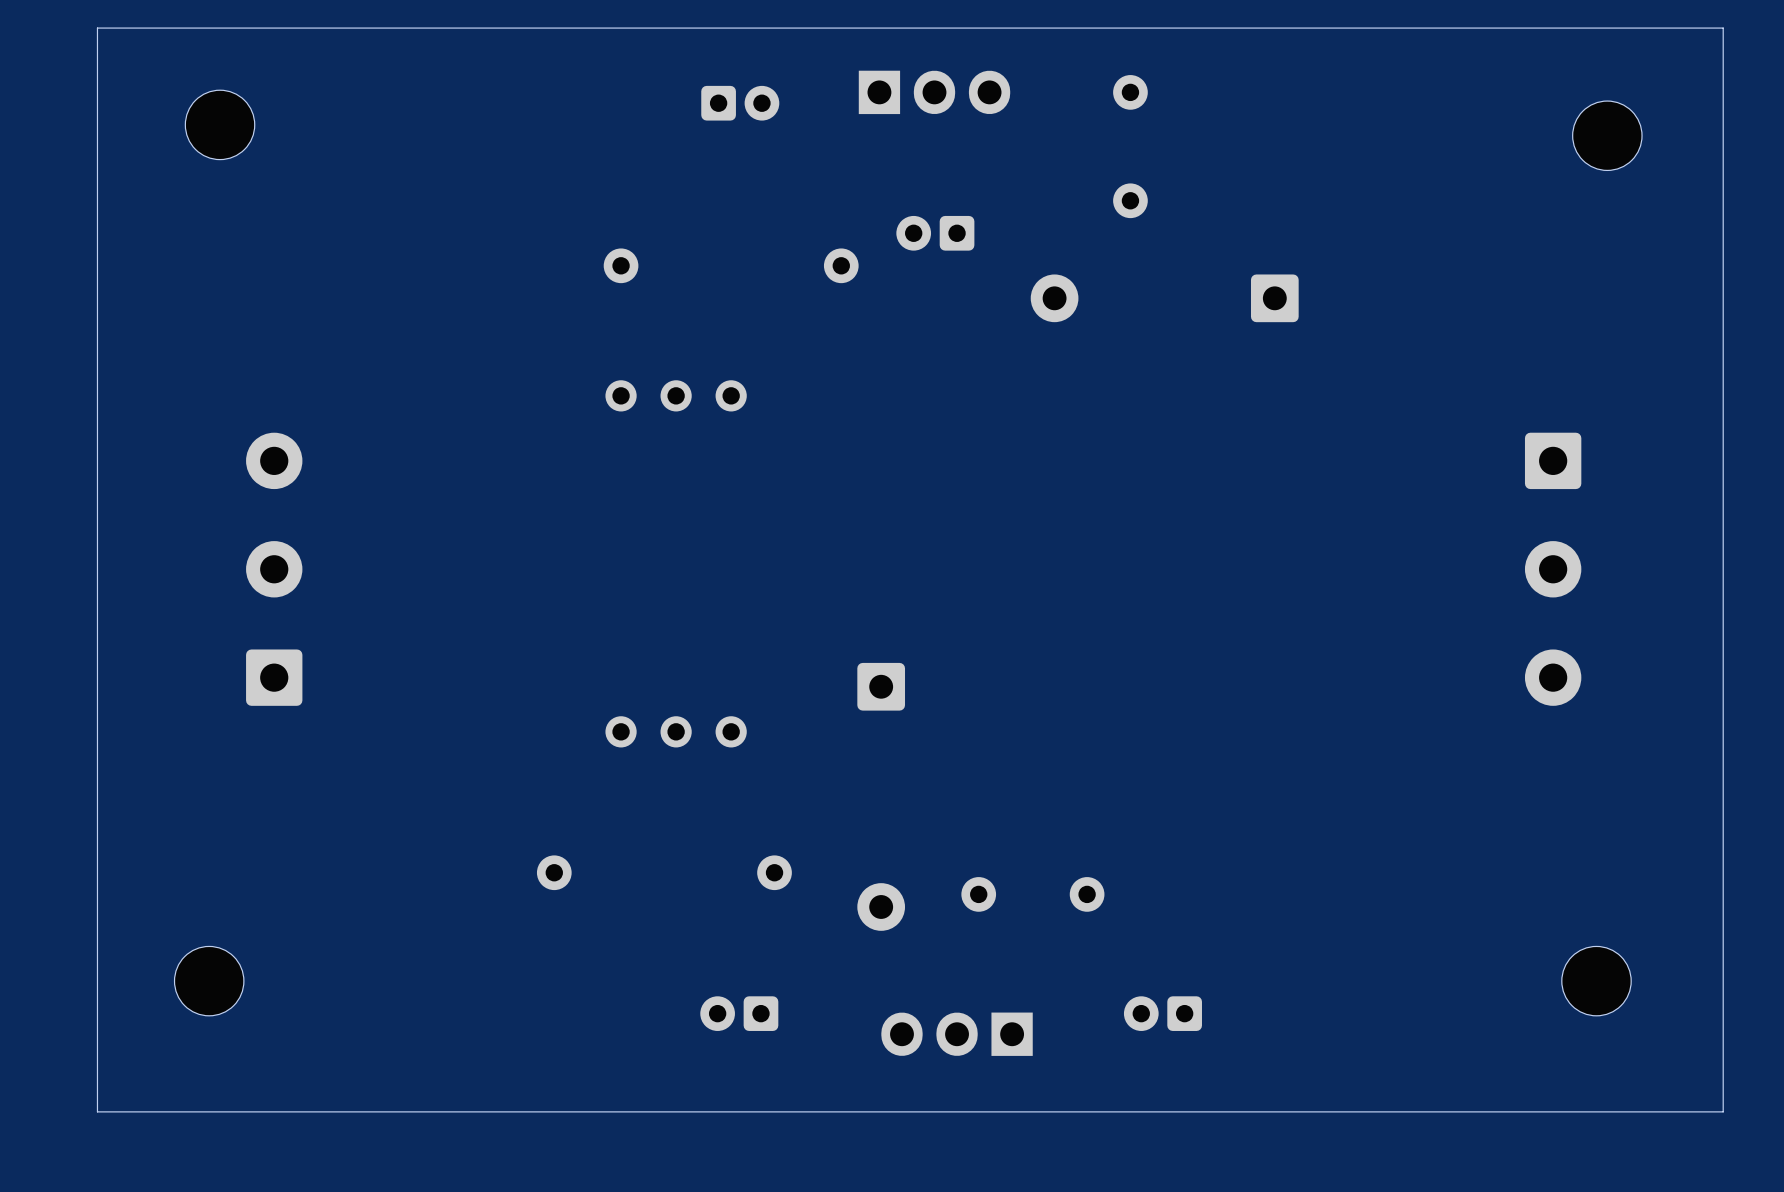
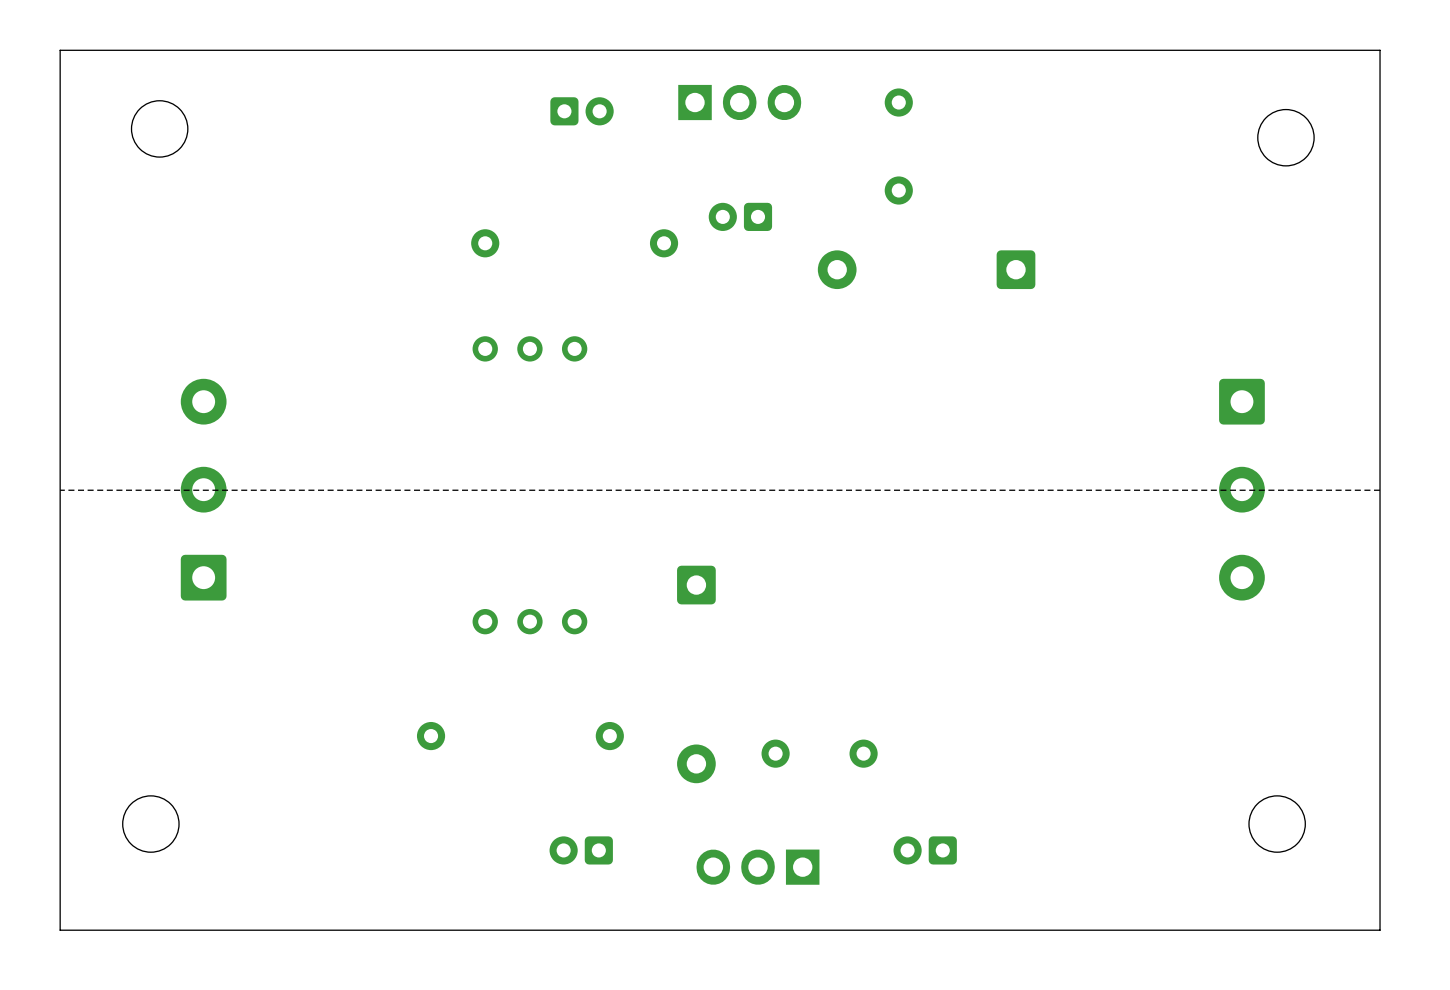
board edge: none -> (1380, 490) (60, 490)

